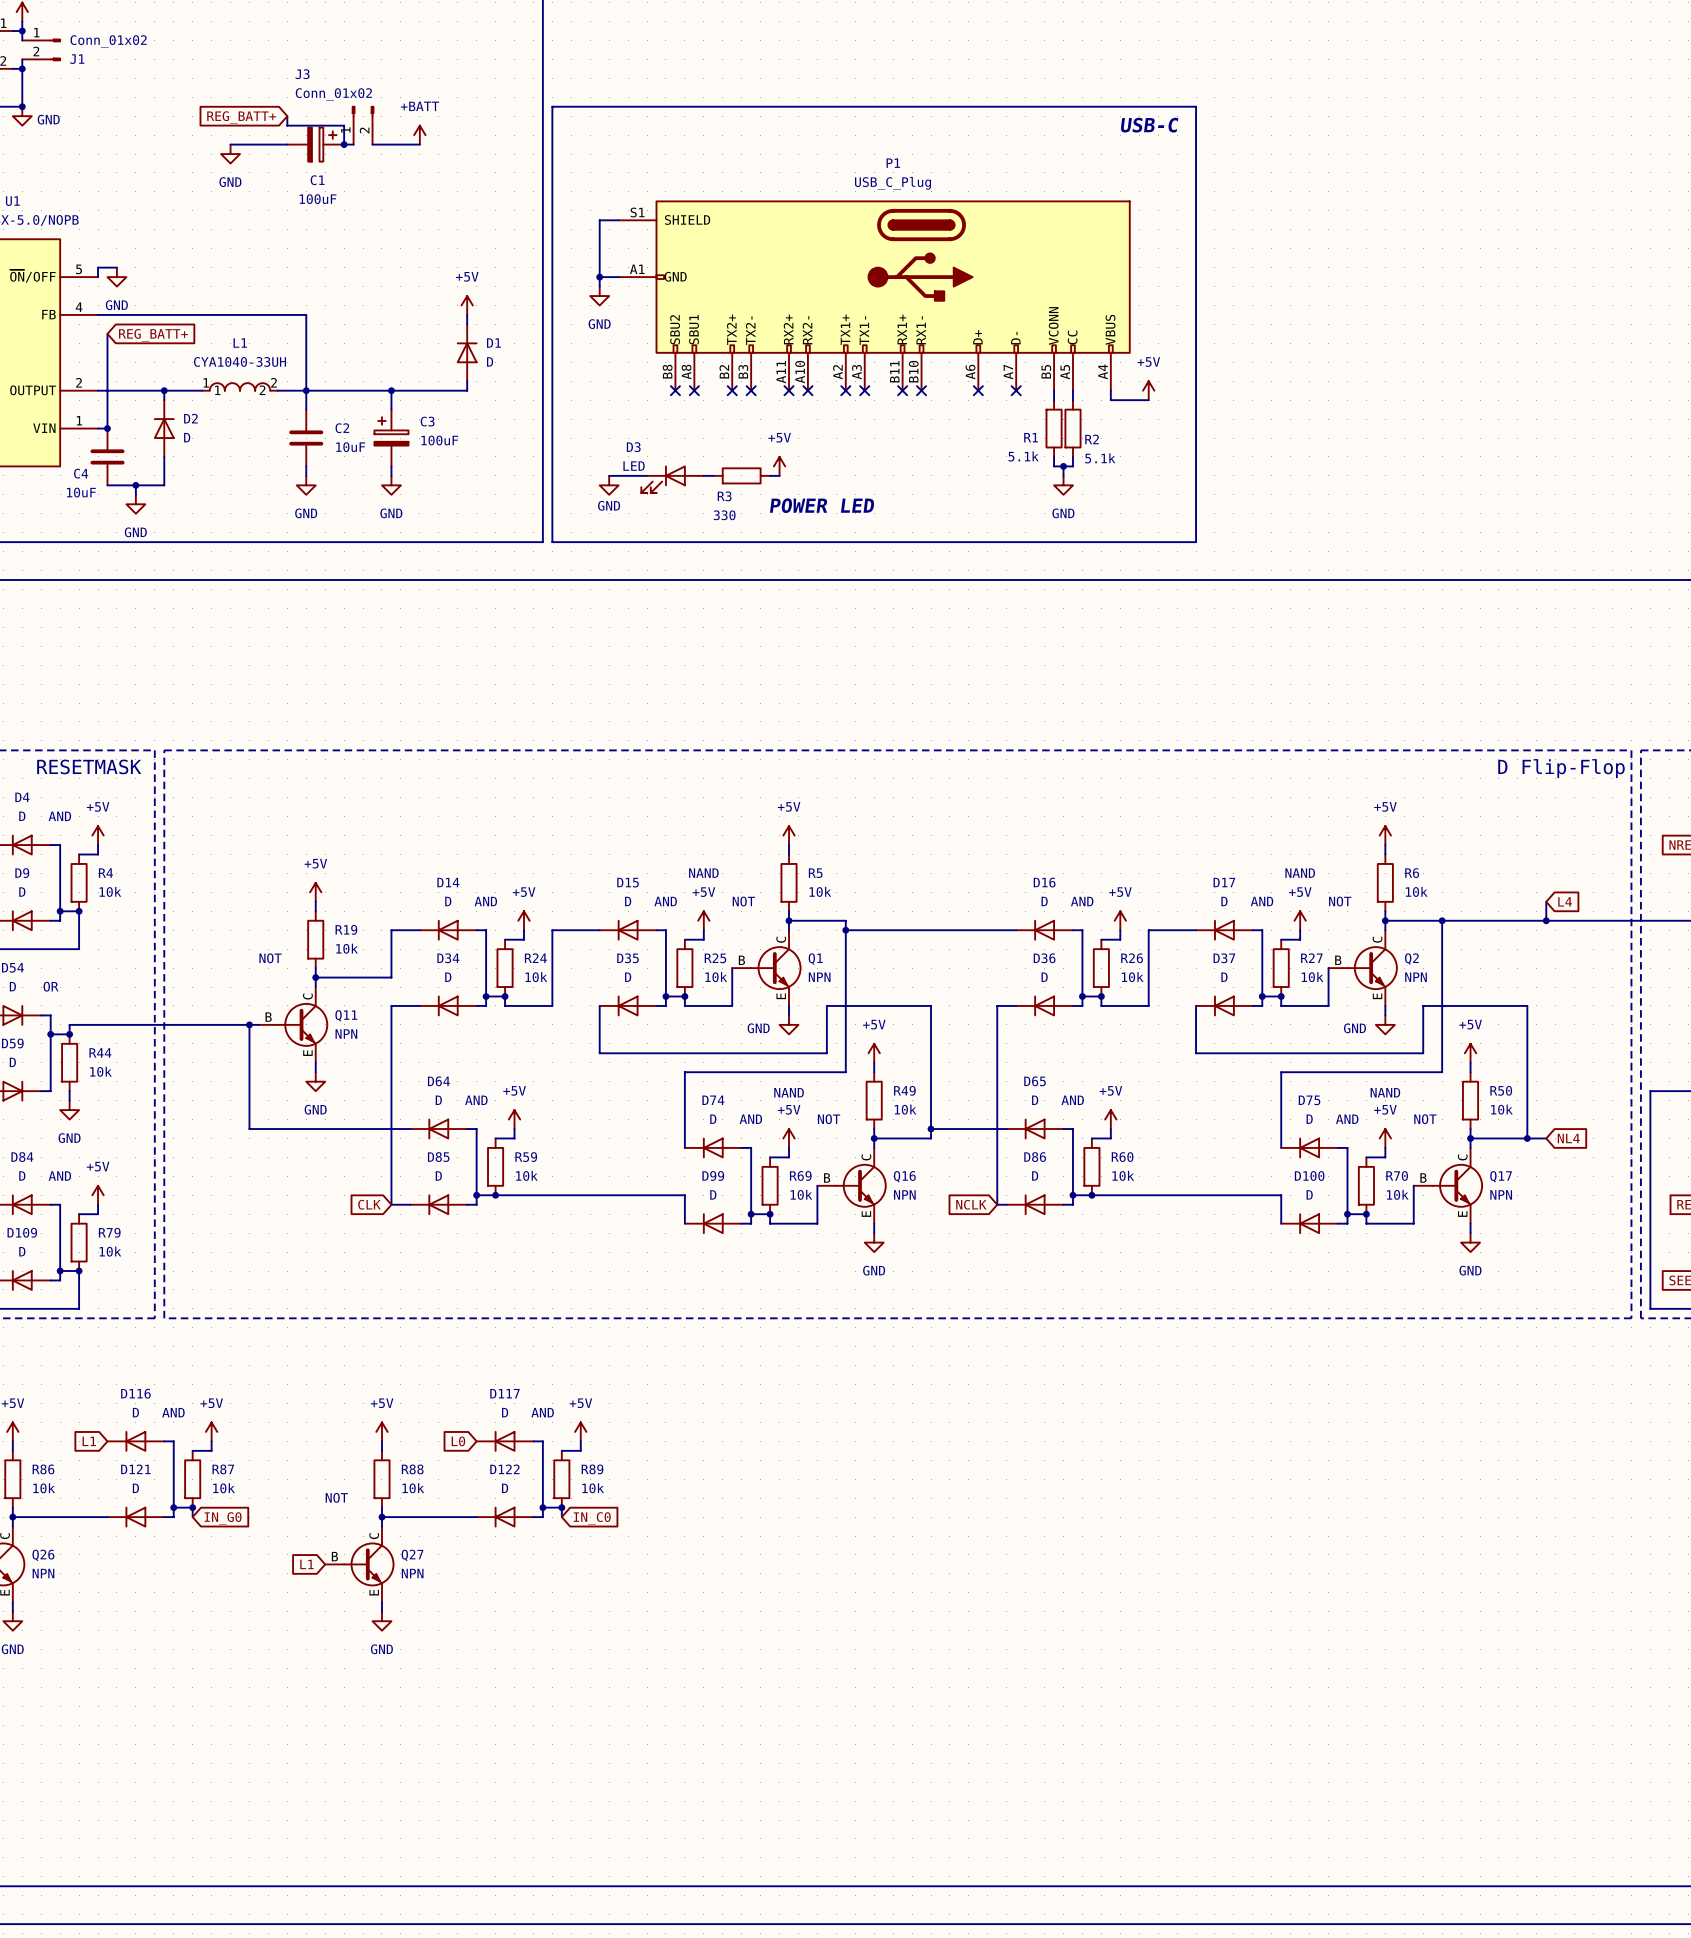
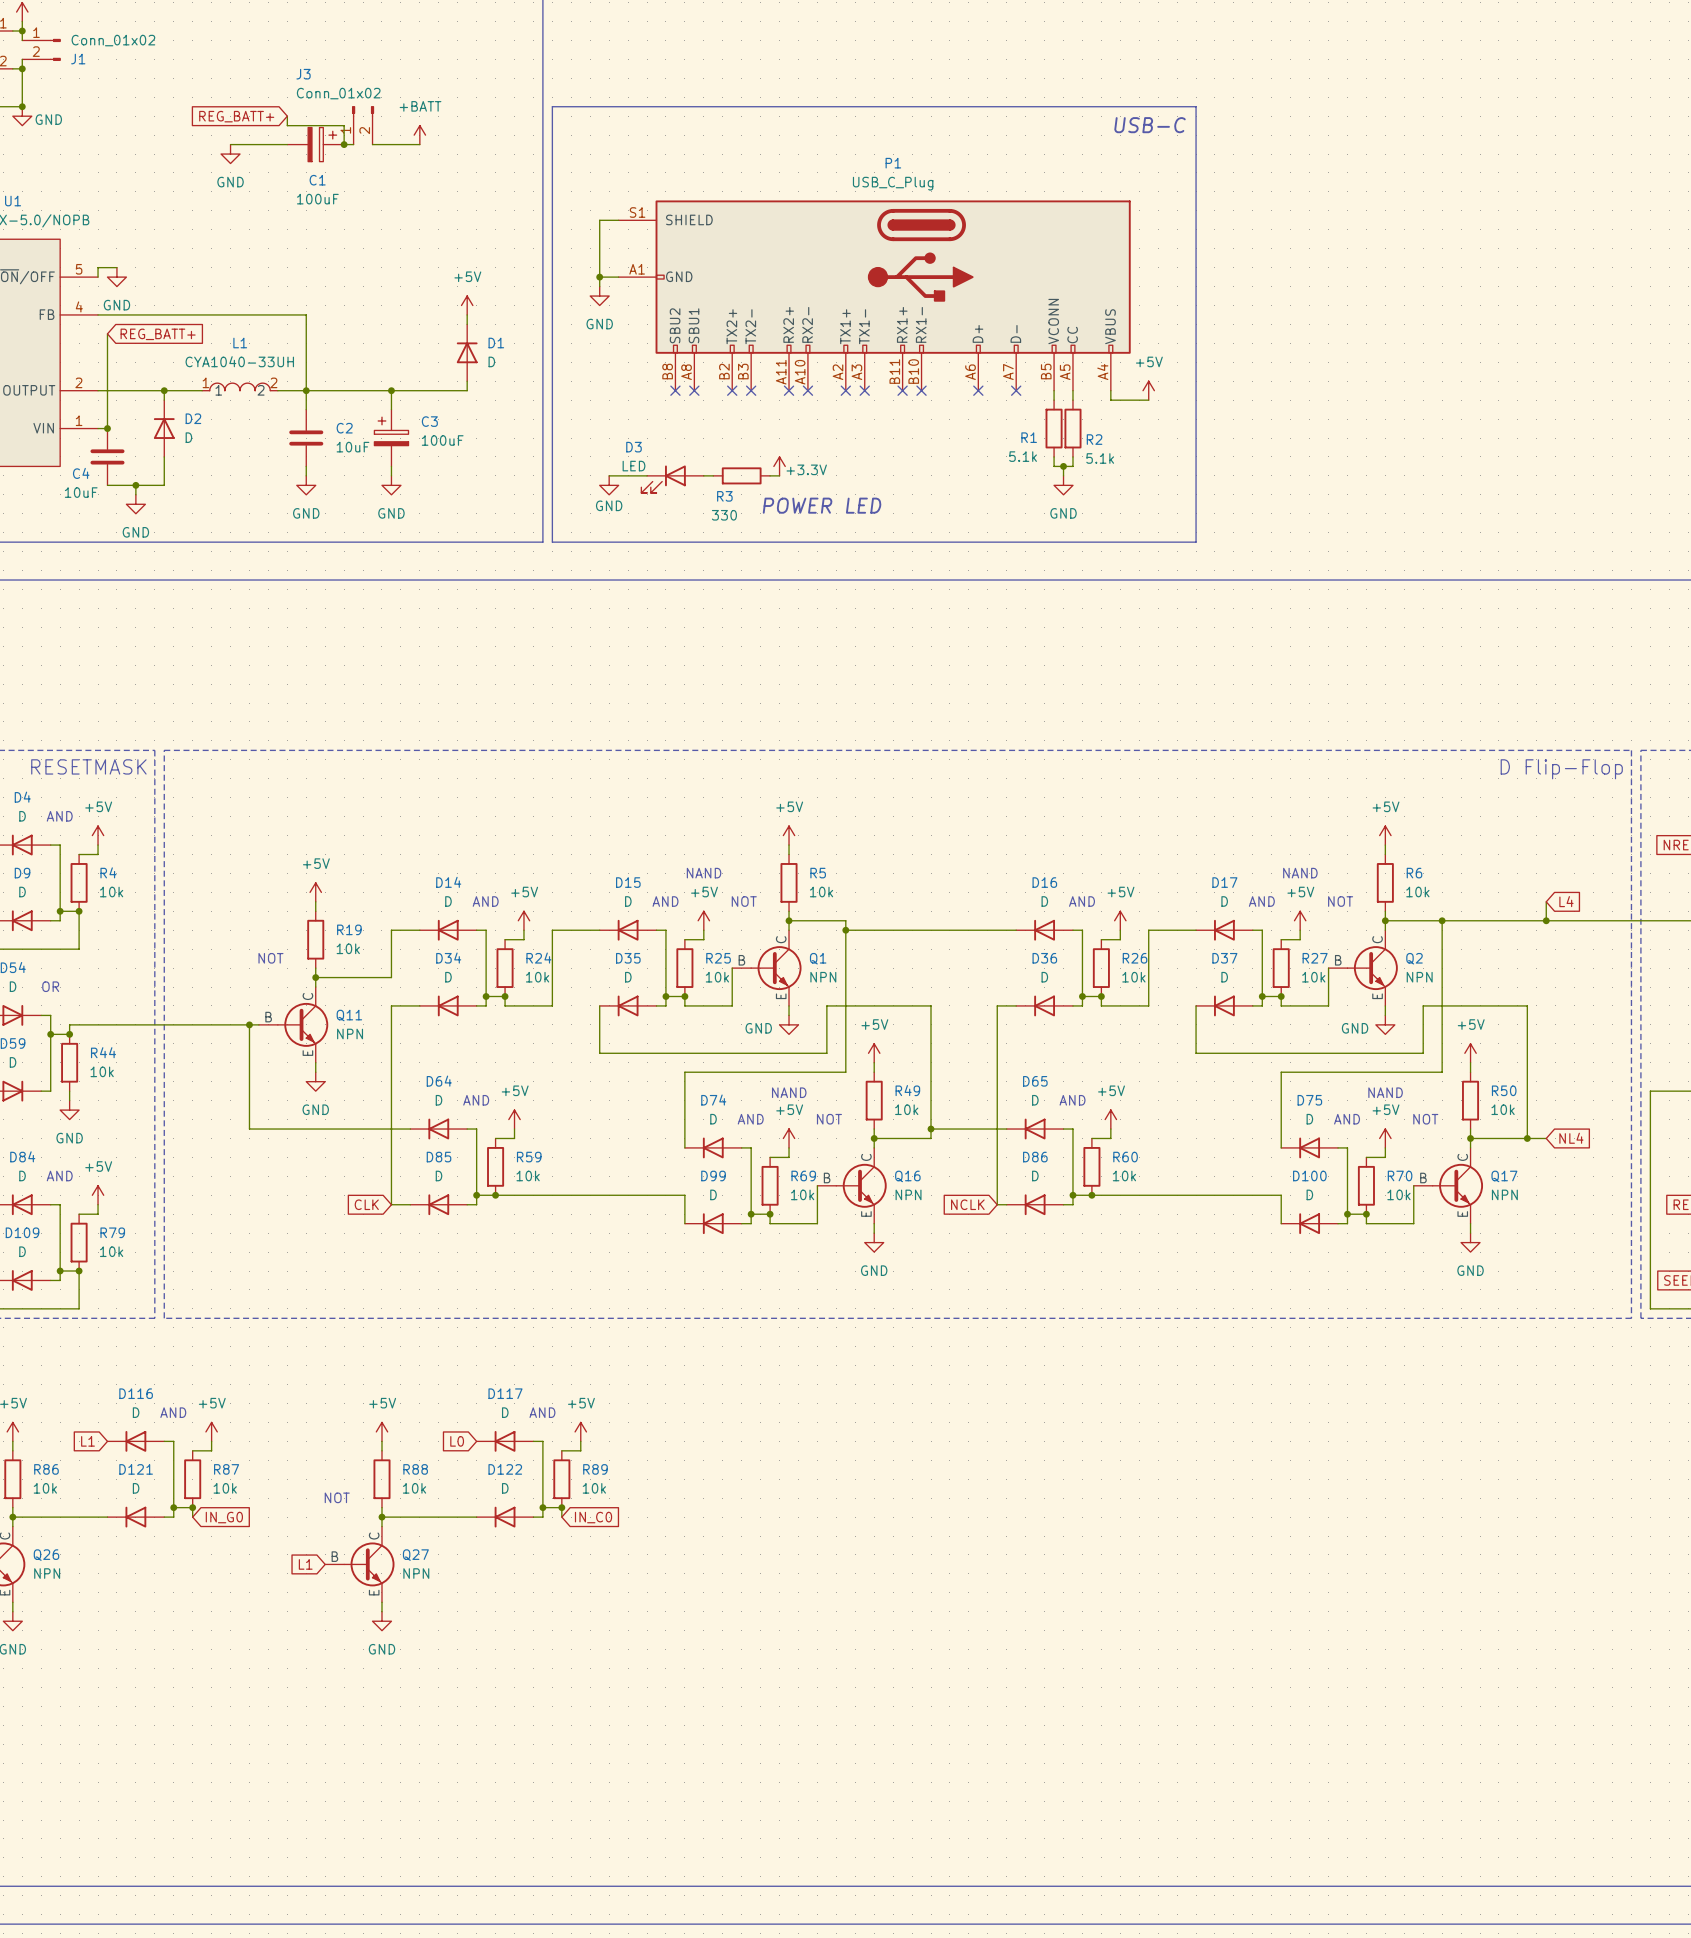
power symbol: +5V (779, 466) -> +3.3V (779, 466)

